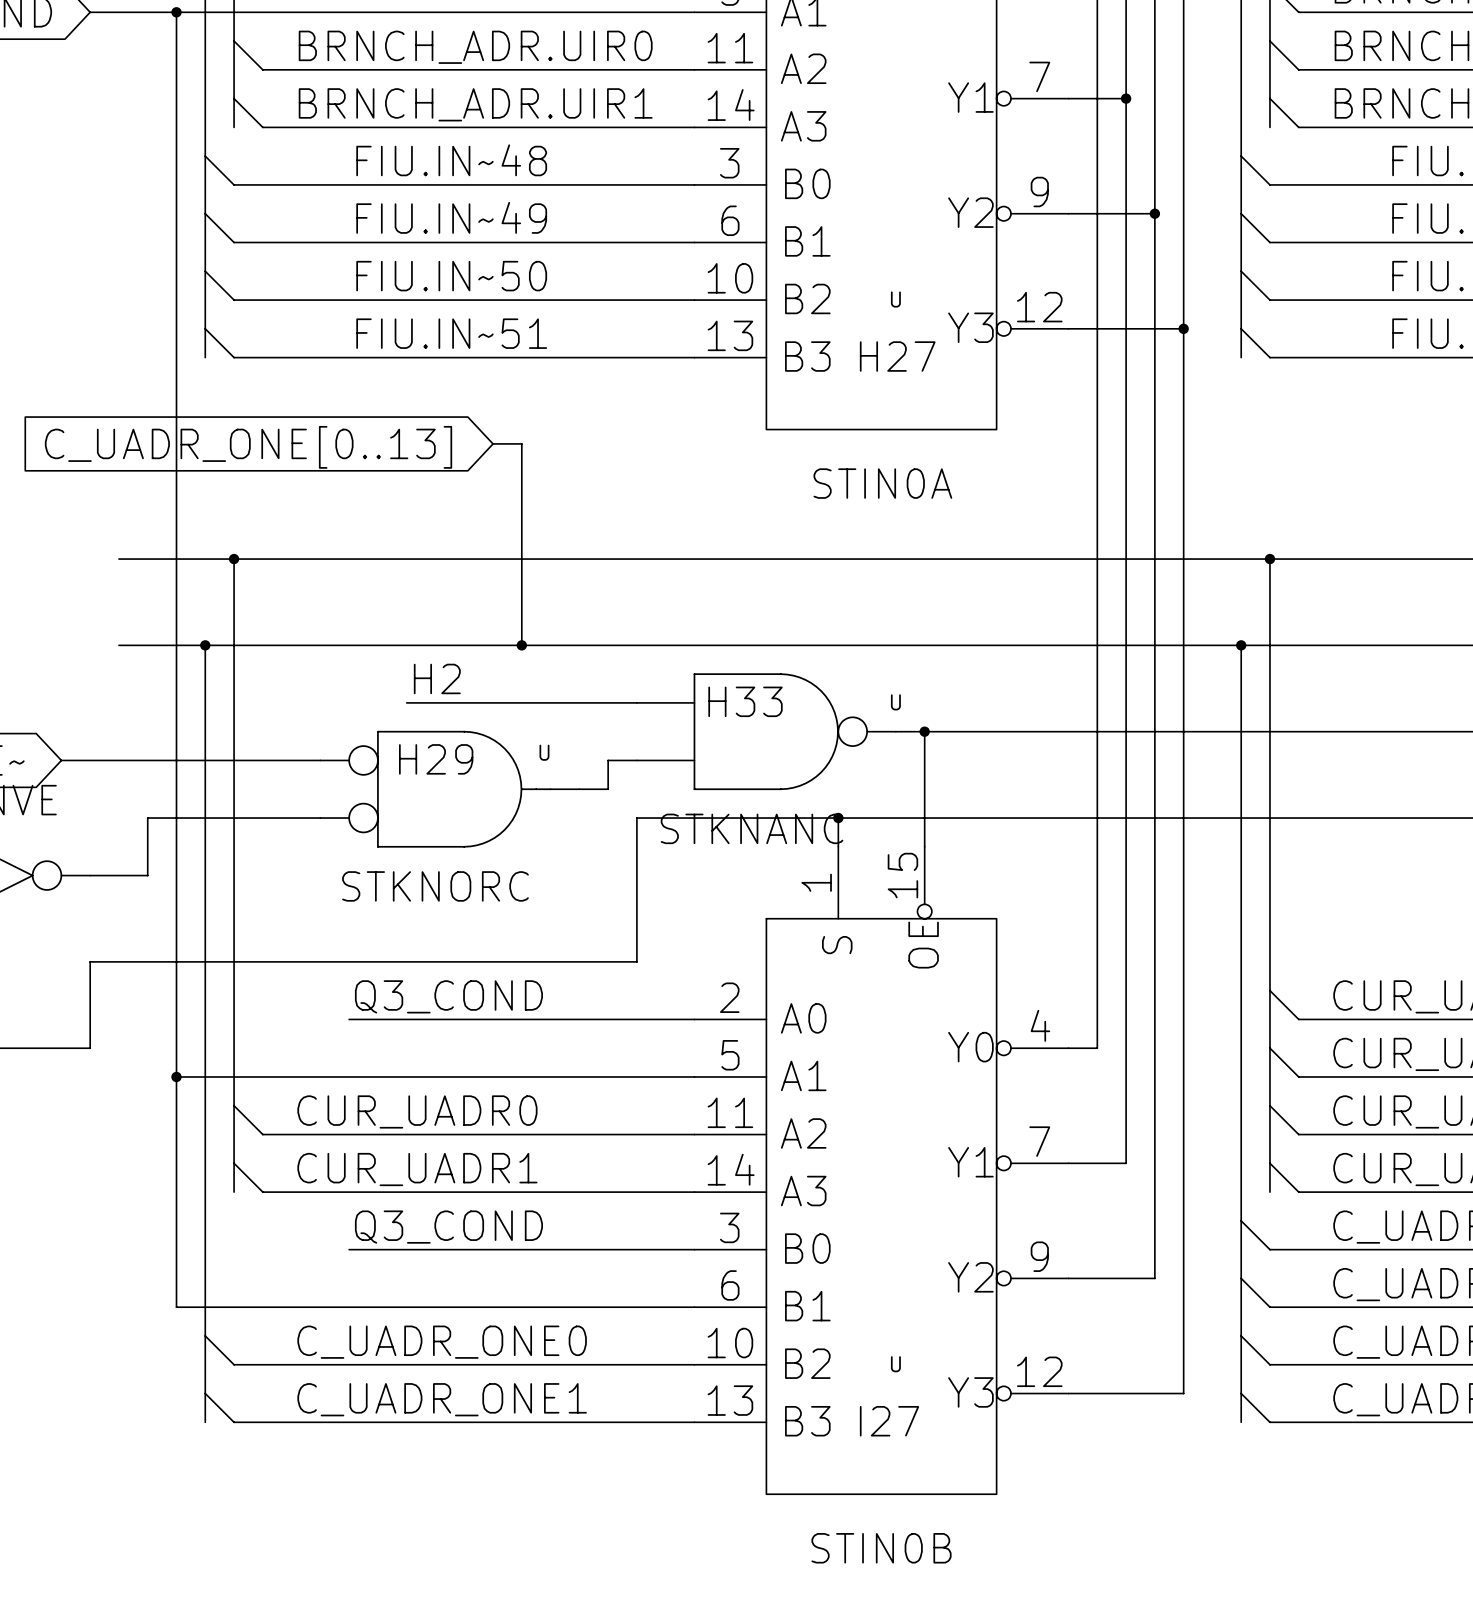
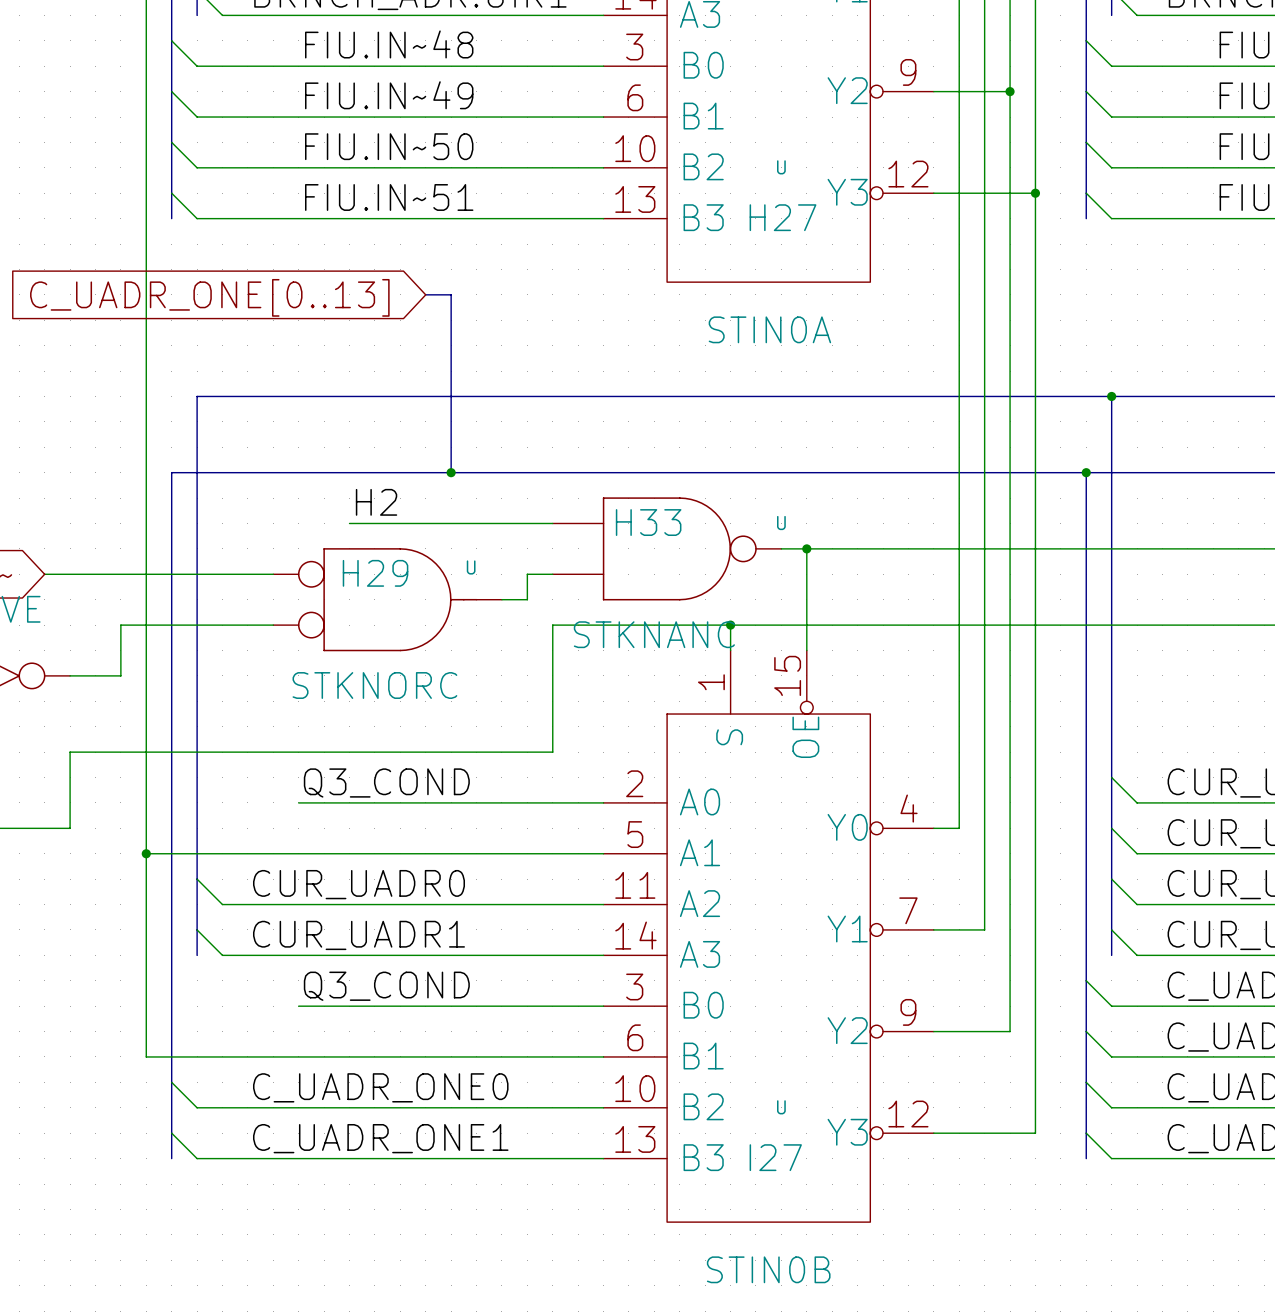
bus: (118, 559) (234, 559) -> none
junction: (234, 559) -> none
bus: (118, 645) (205, 645) -> none
junction: (205, 645) -> none

